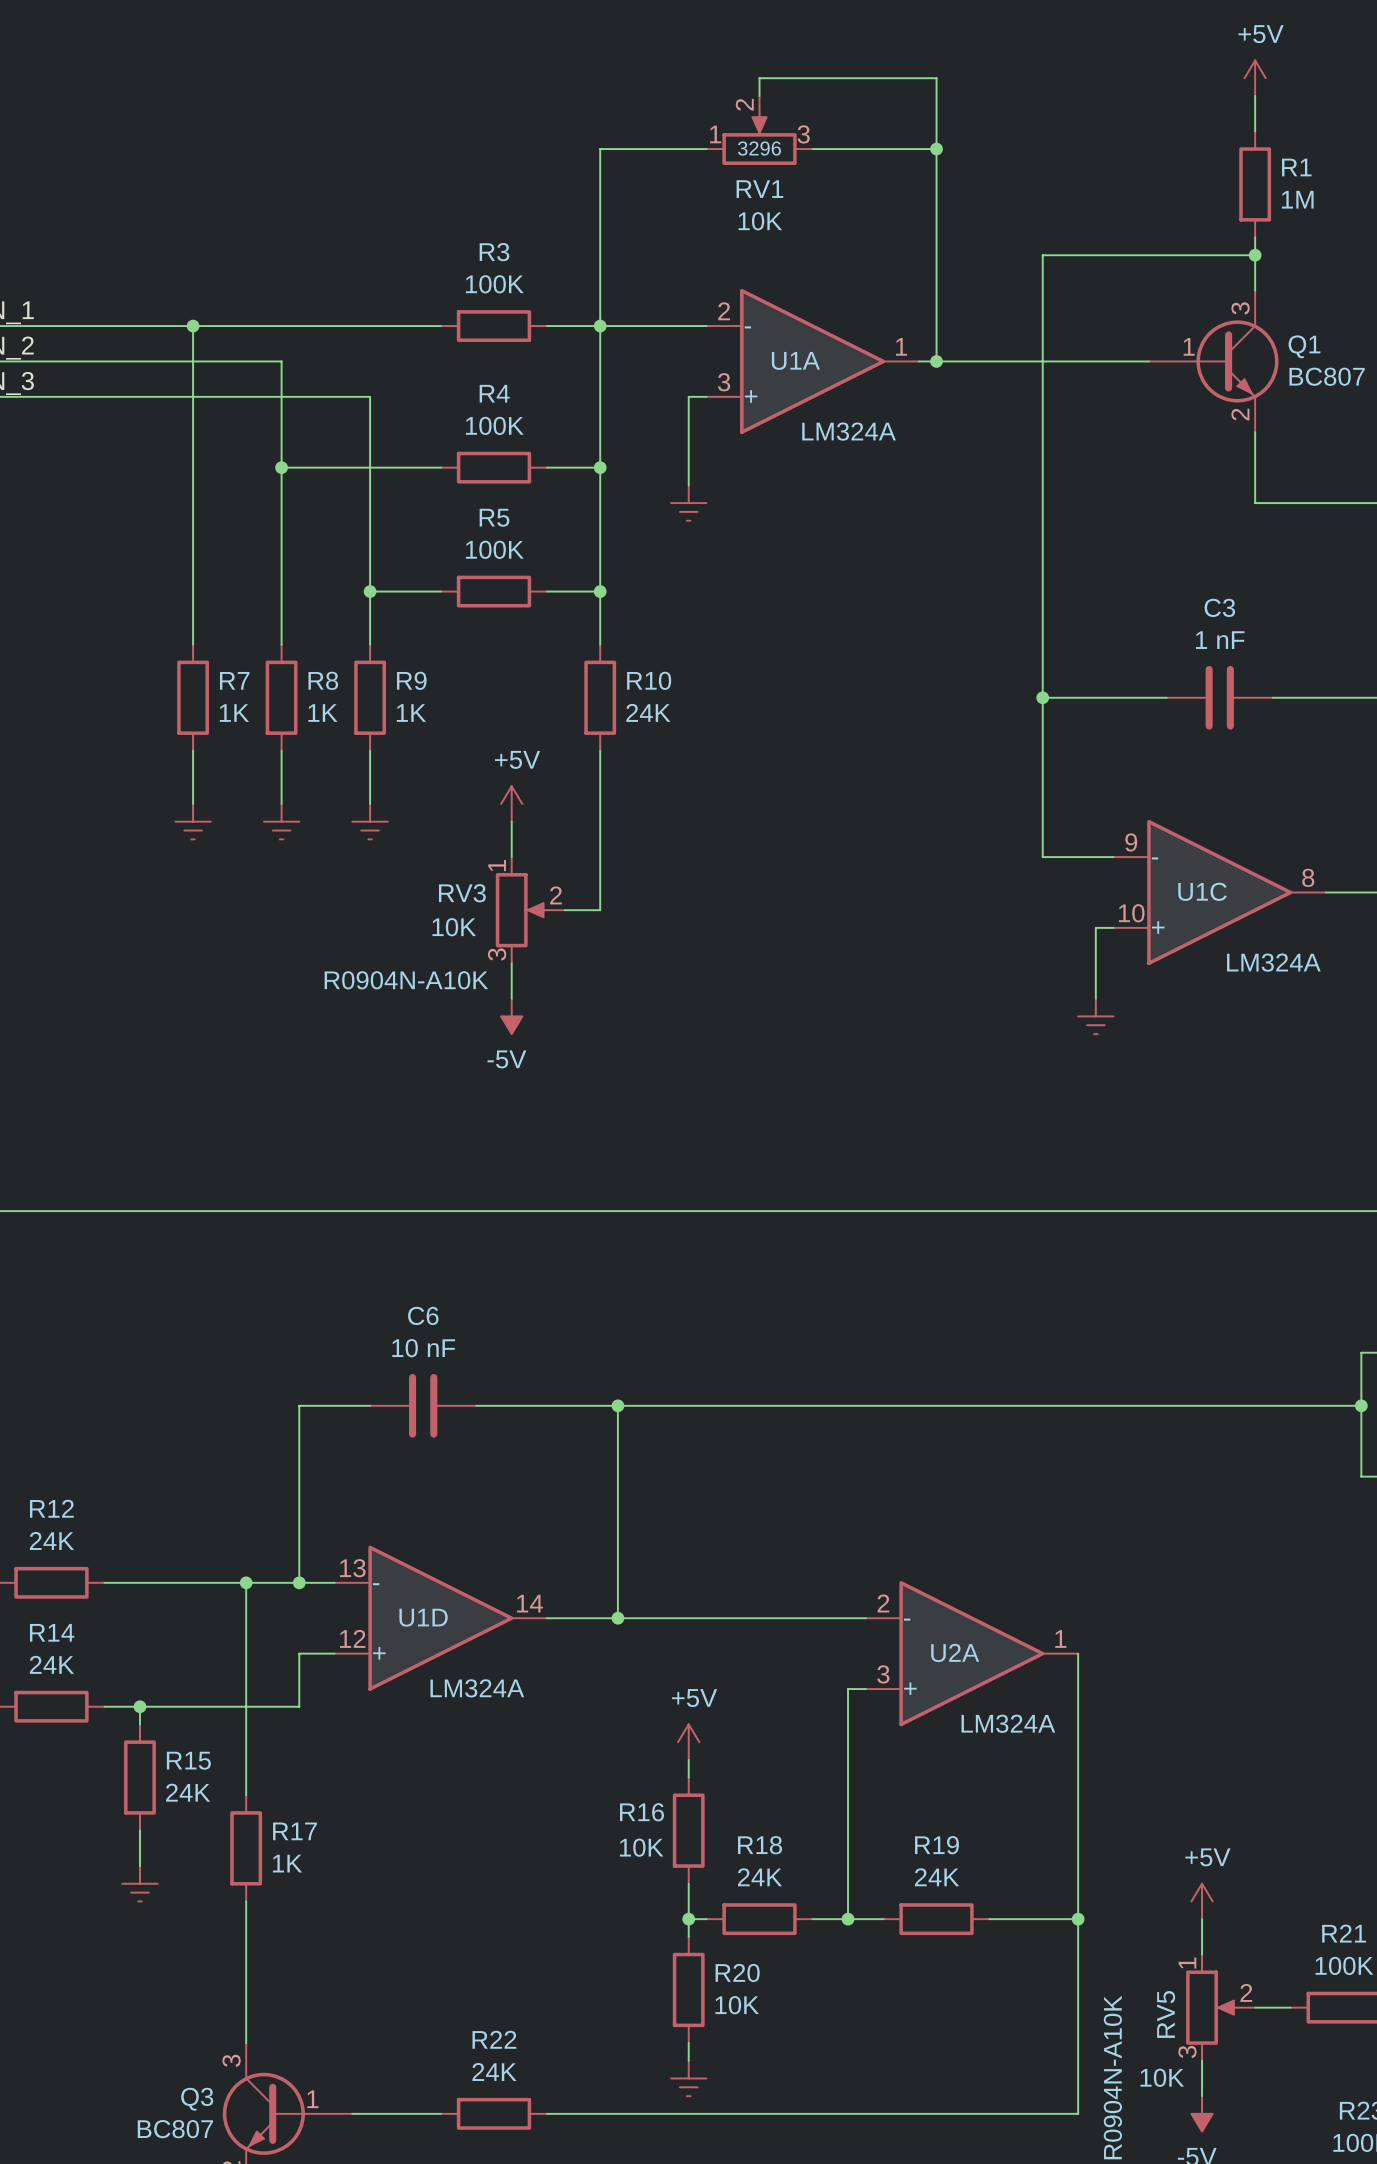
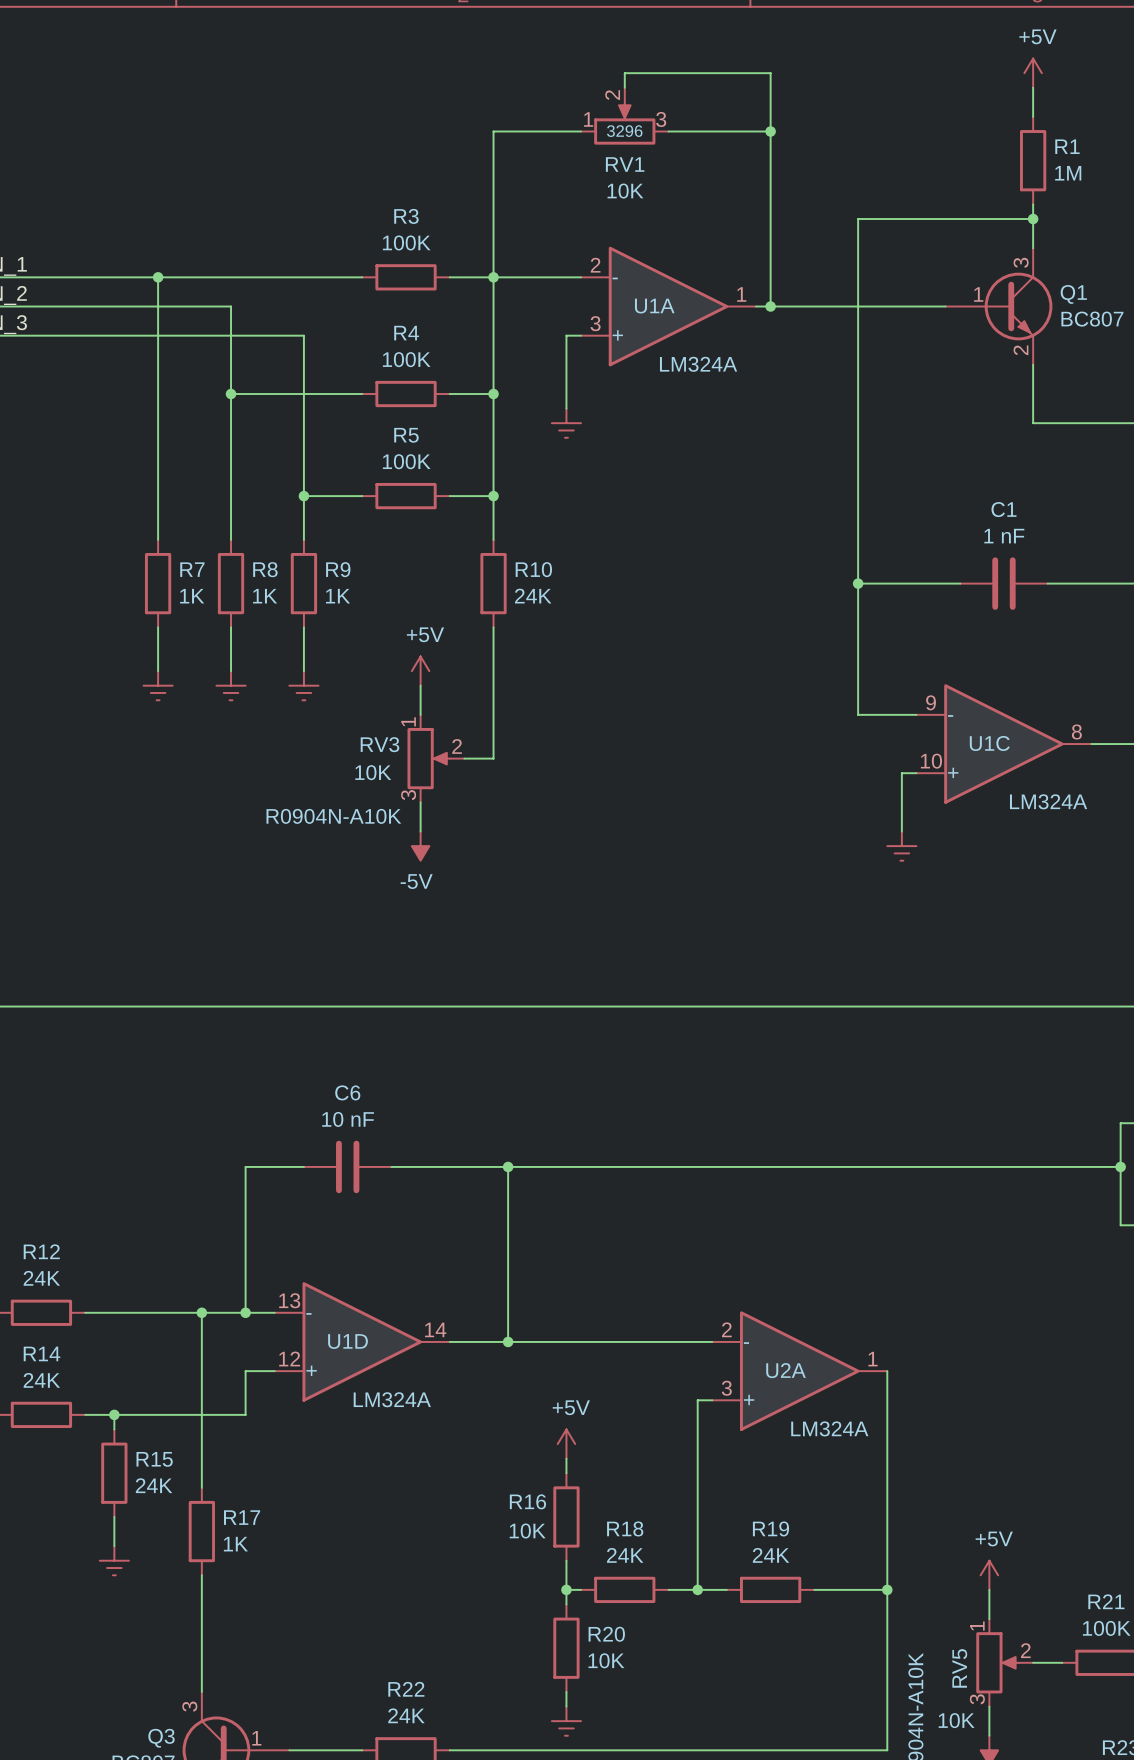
C3 name: C3 (1219, 607) -> C1 (1003, 509)

